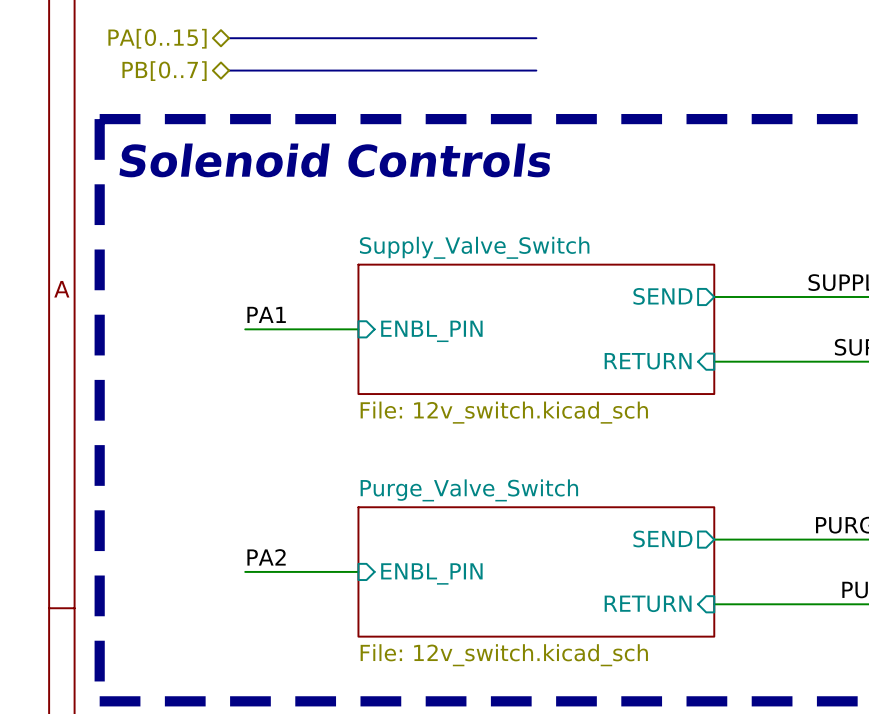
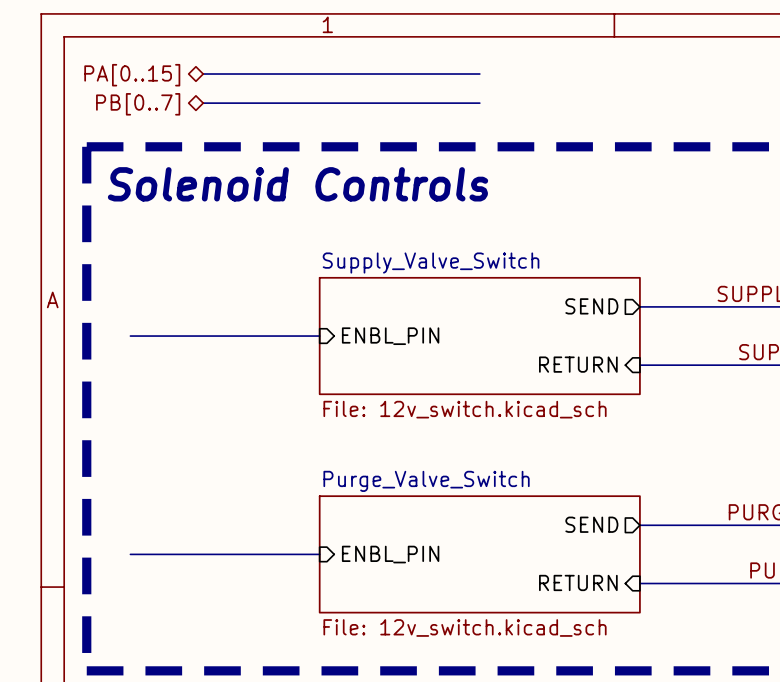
label: PA1 (266, 314) -> none
wire: none -> (130, 336) (217, 336)
label: PA2 (266, 557) -> none
wire: none -> (130, 554) (217, 554)

